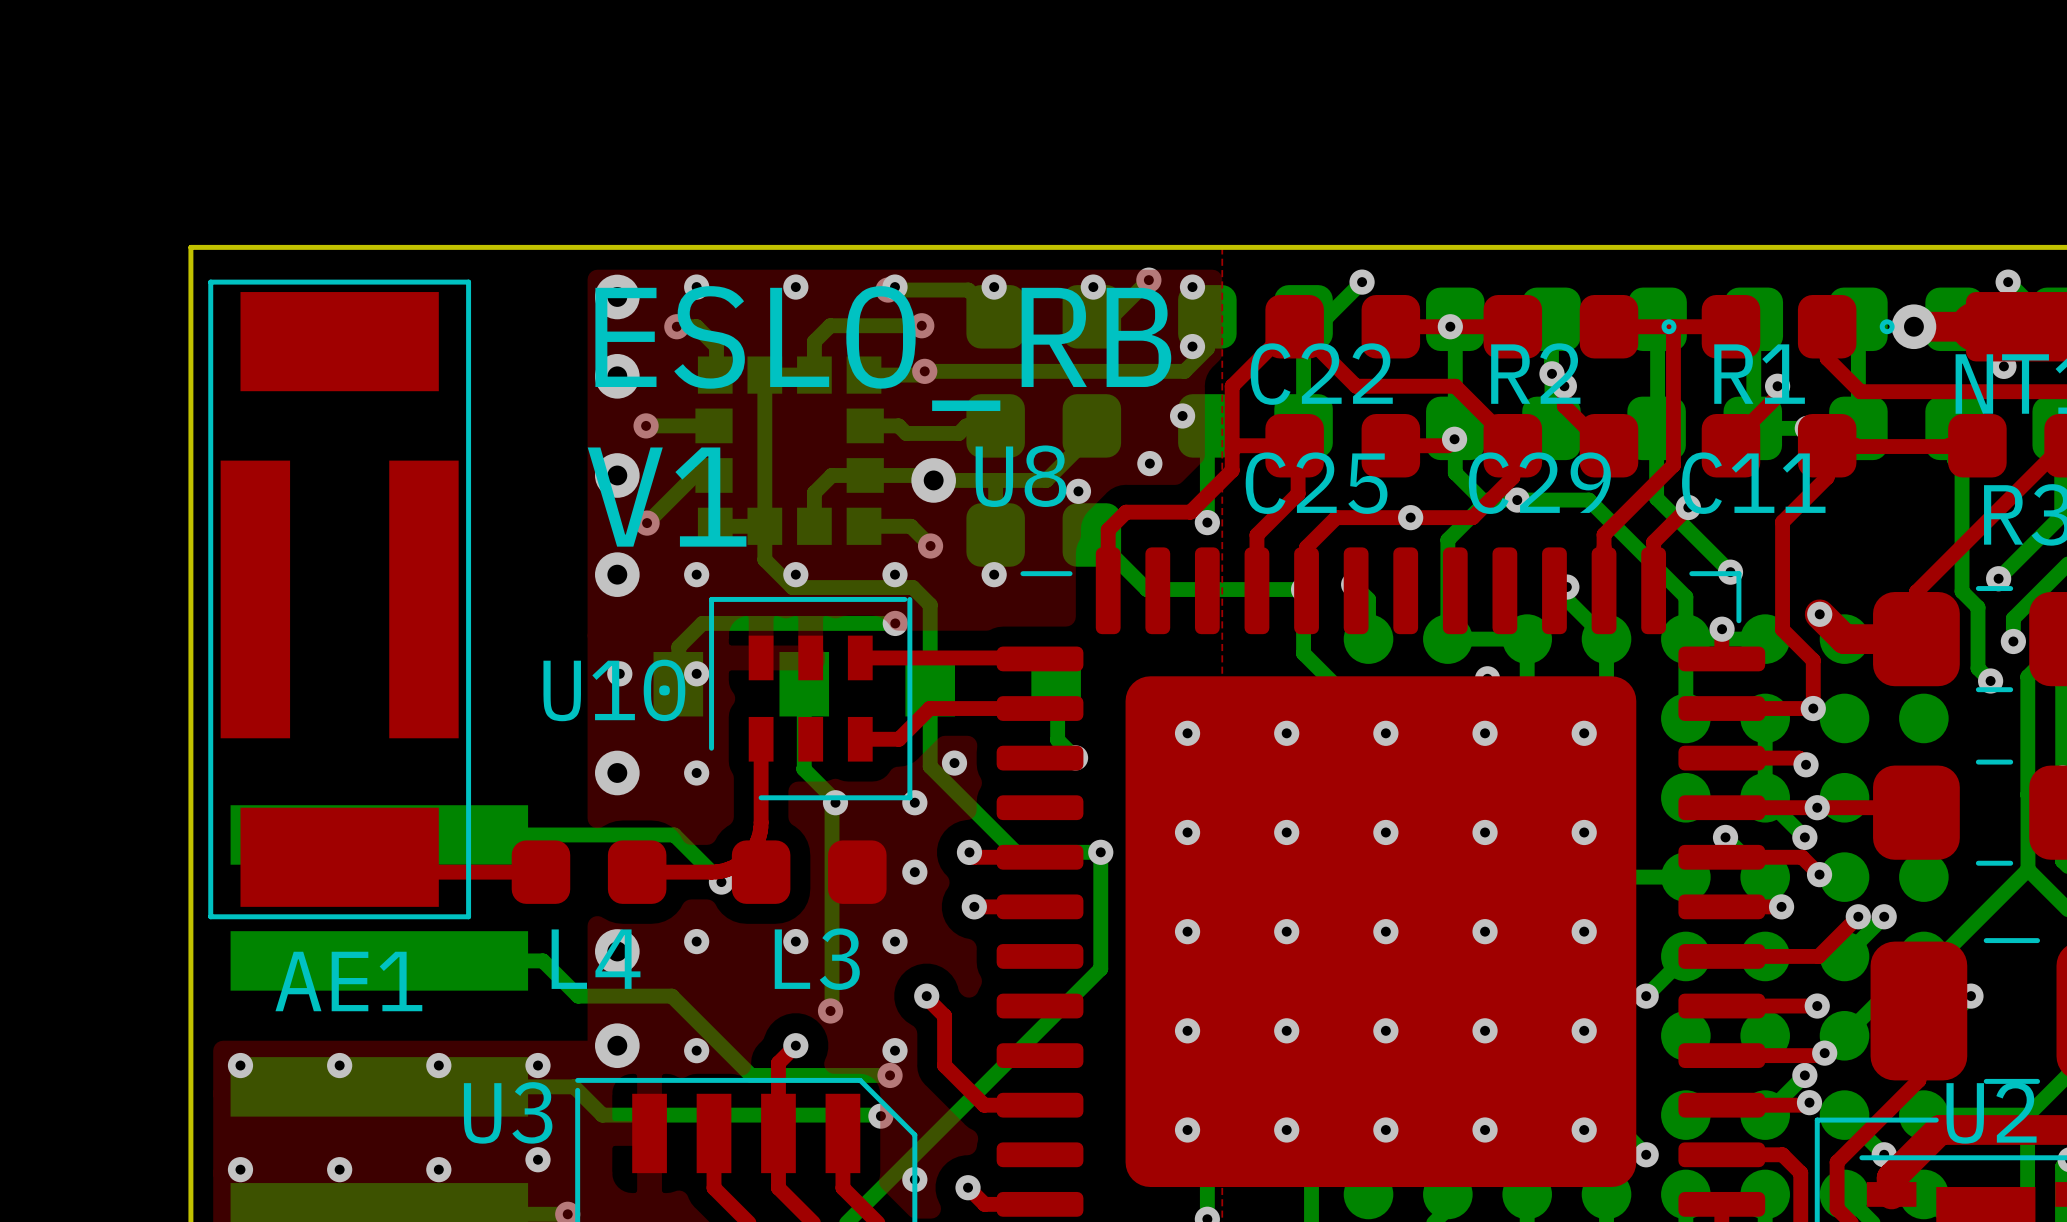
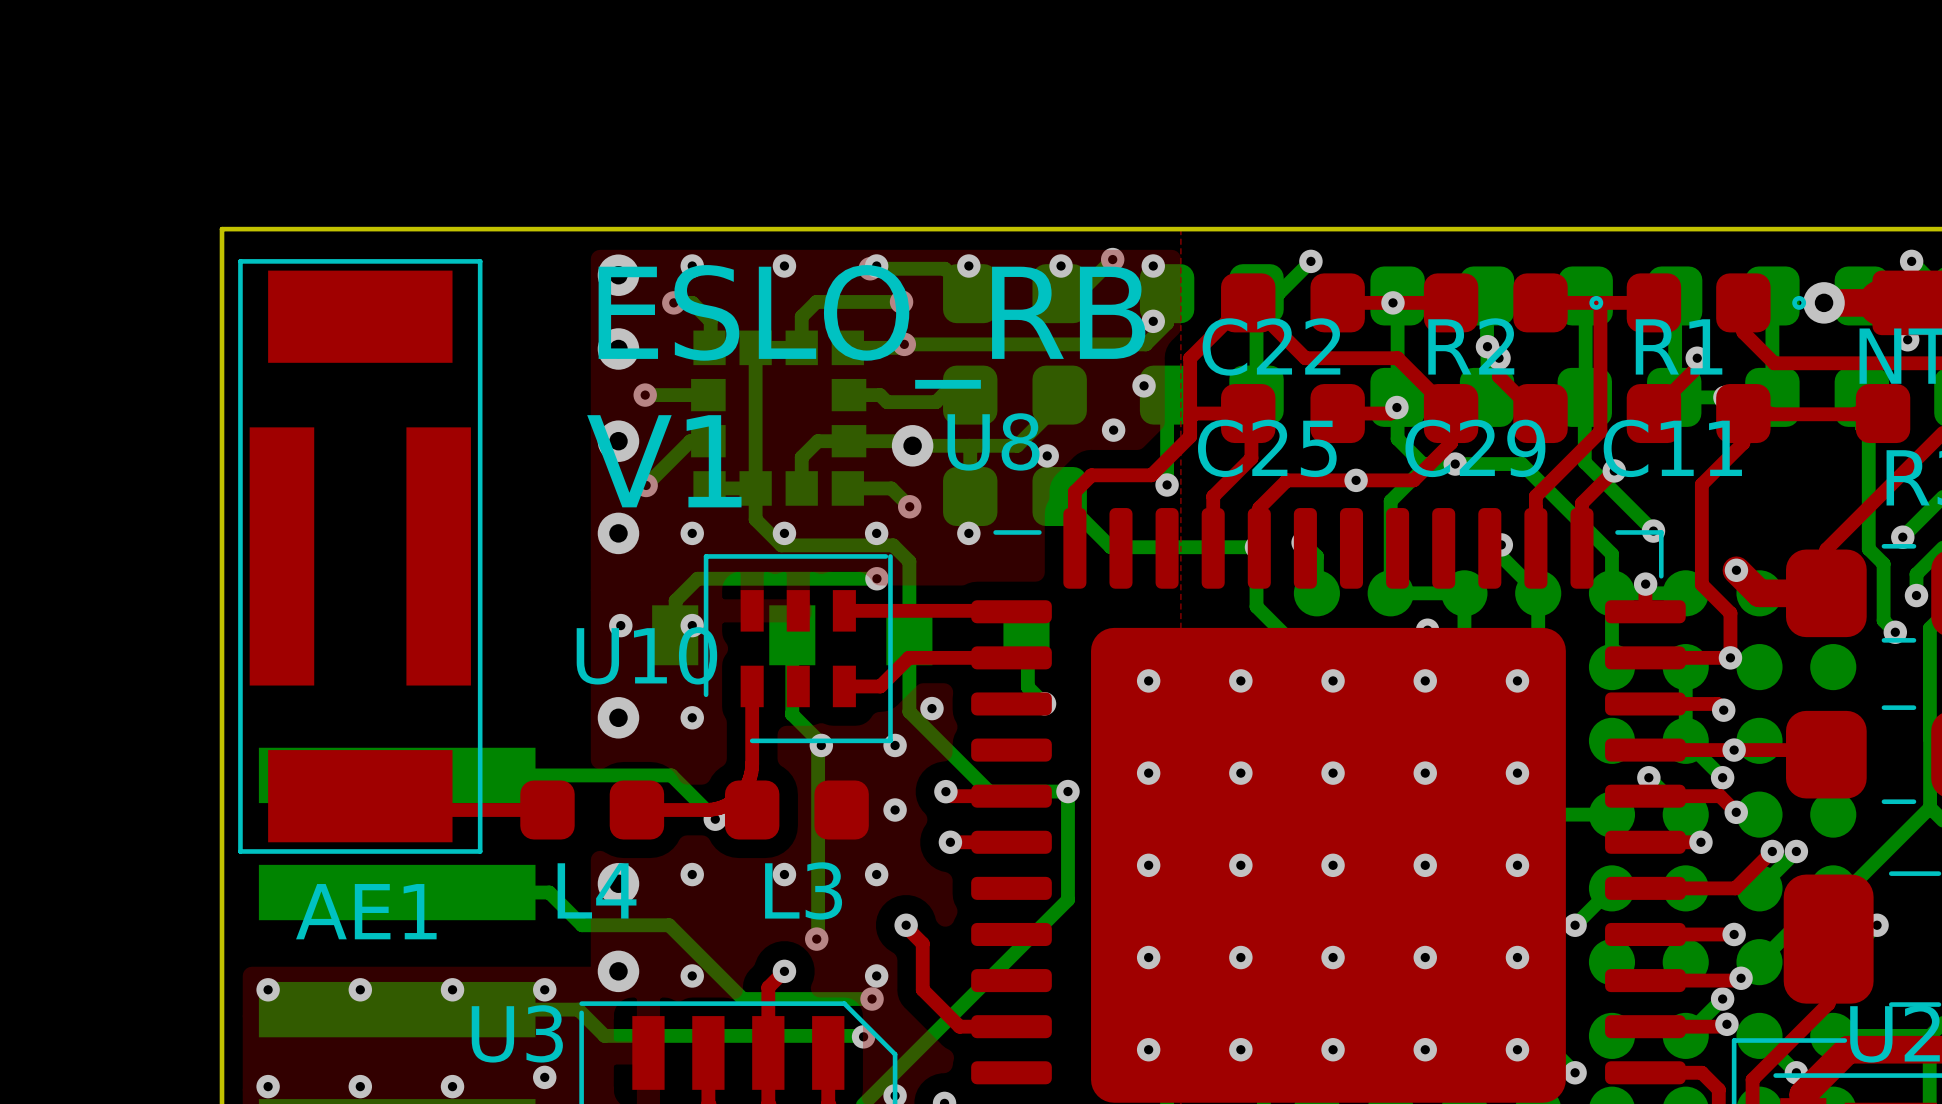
U10 name position: U10 (614, 690) -> U10 (646, 655)

